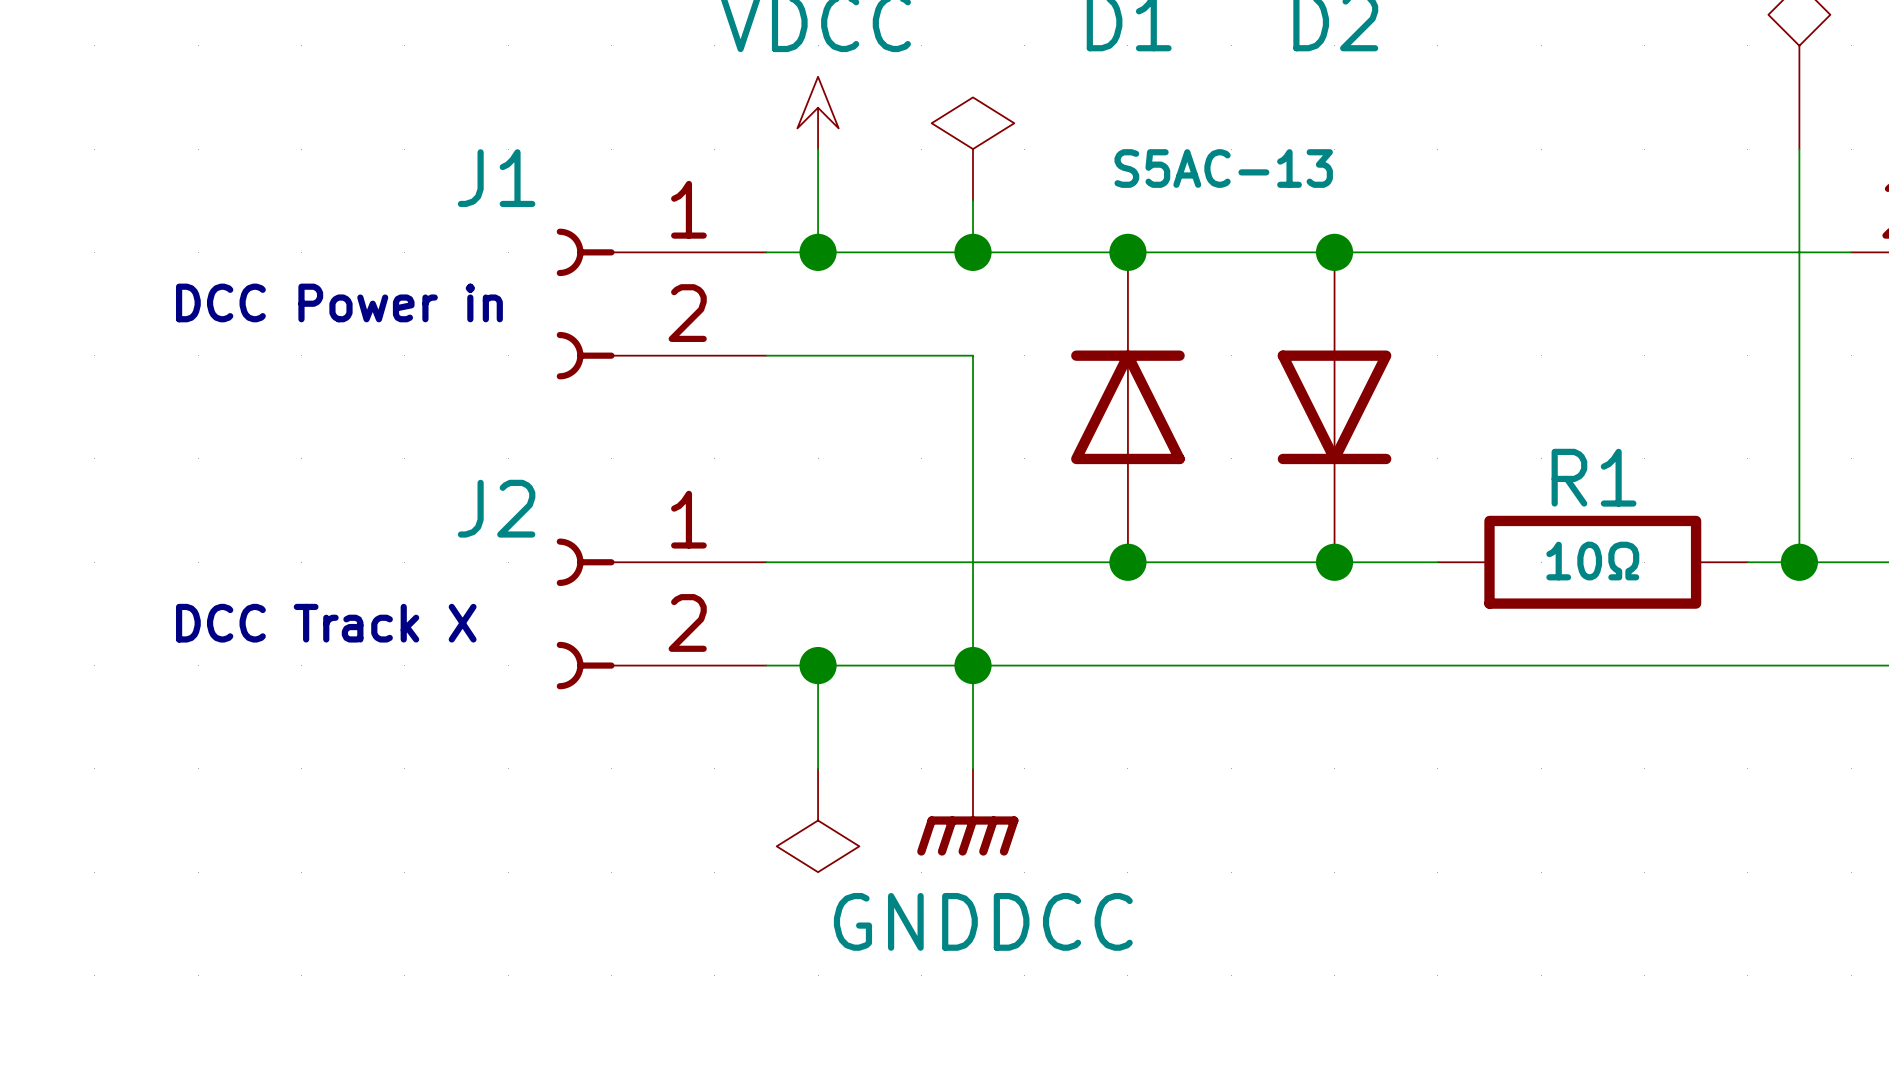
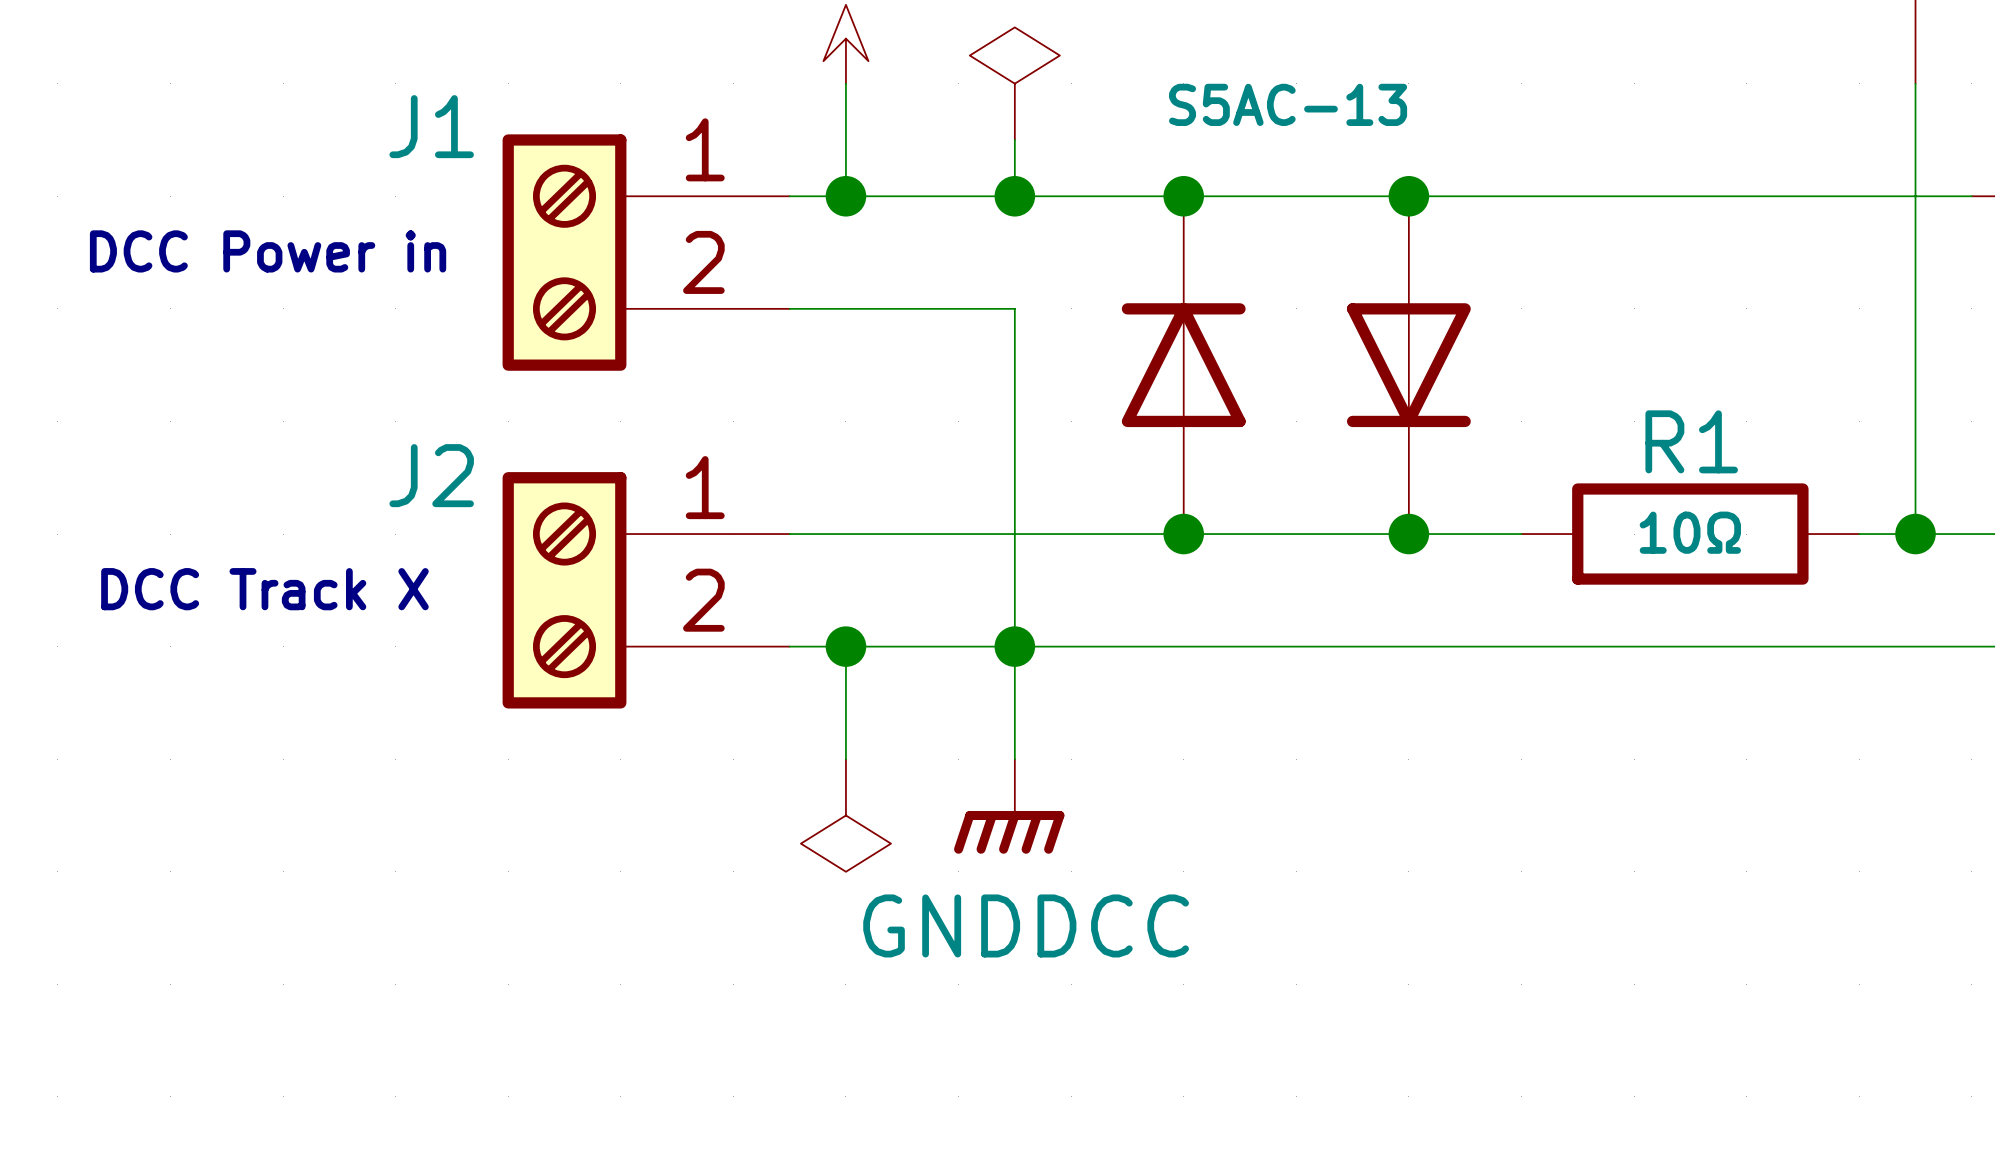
J1 symbol: [556, 228, 767, 380] -> [502, 134, 790, 371]
text position: DCC Power in (339, 302) -> DCC Power in (268, 251)
J2 symbol: [556, 538, 767, 690] -> [502, 472, 790, 709]
text position: DCC Track X (326, 623) -> DCC Track X (264, 589)

